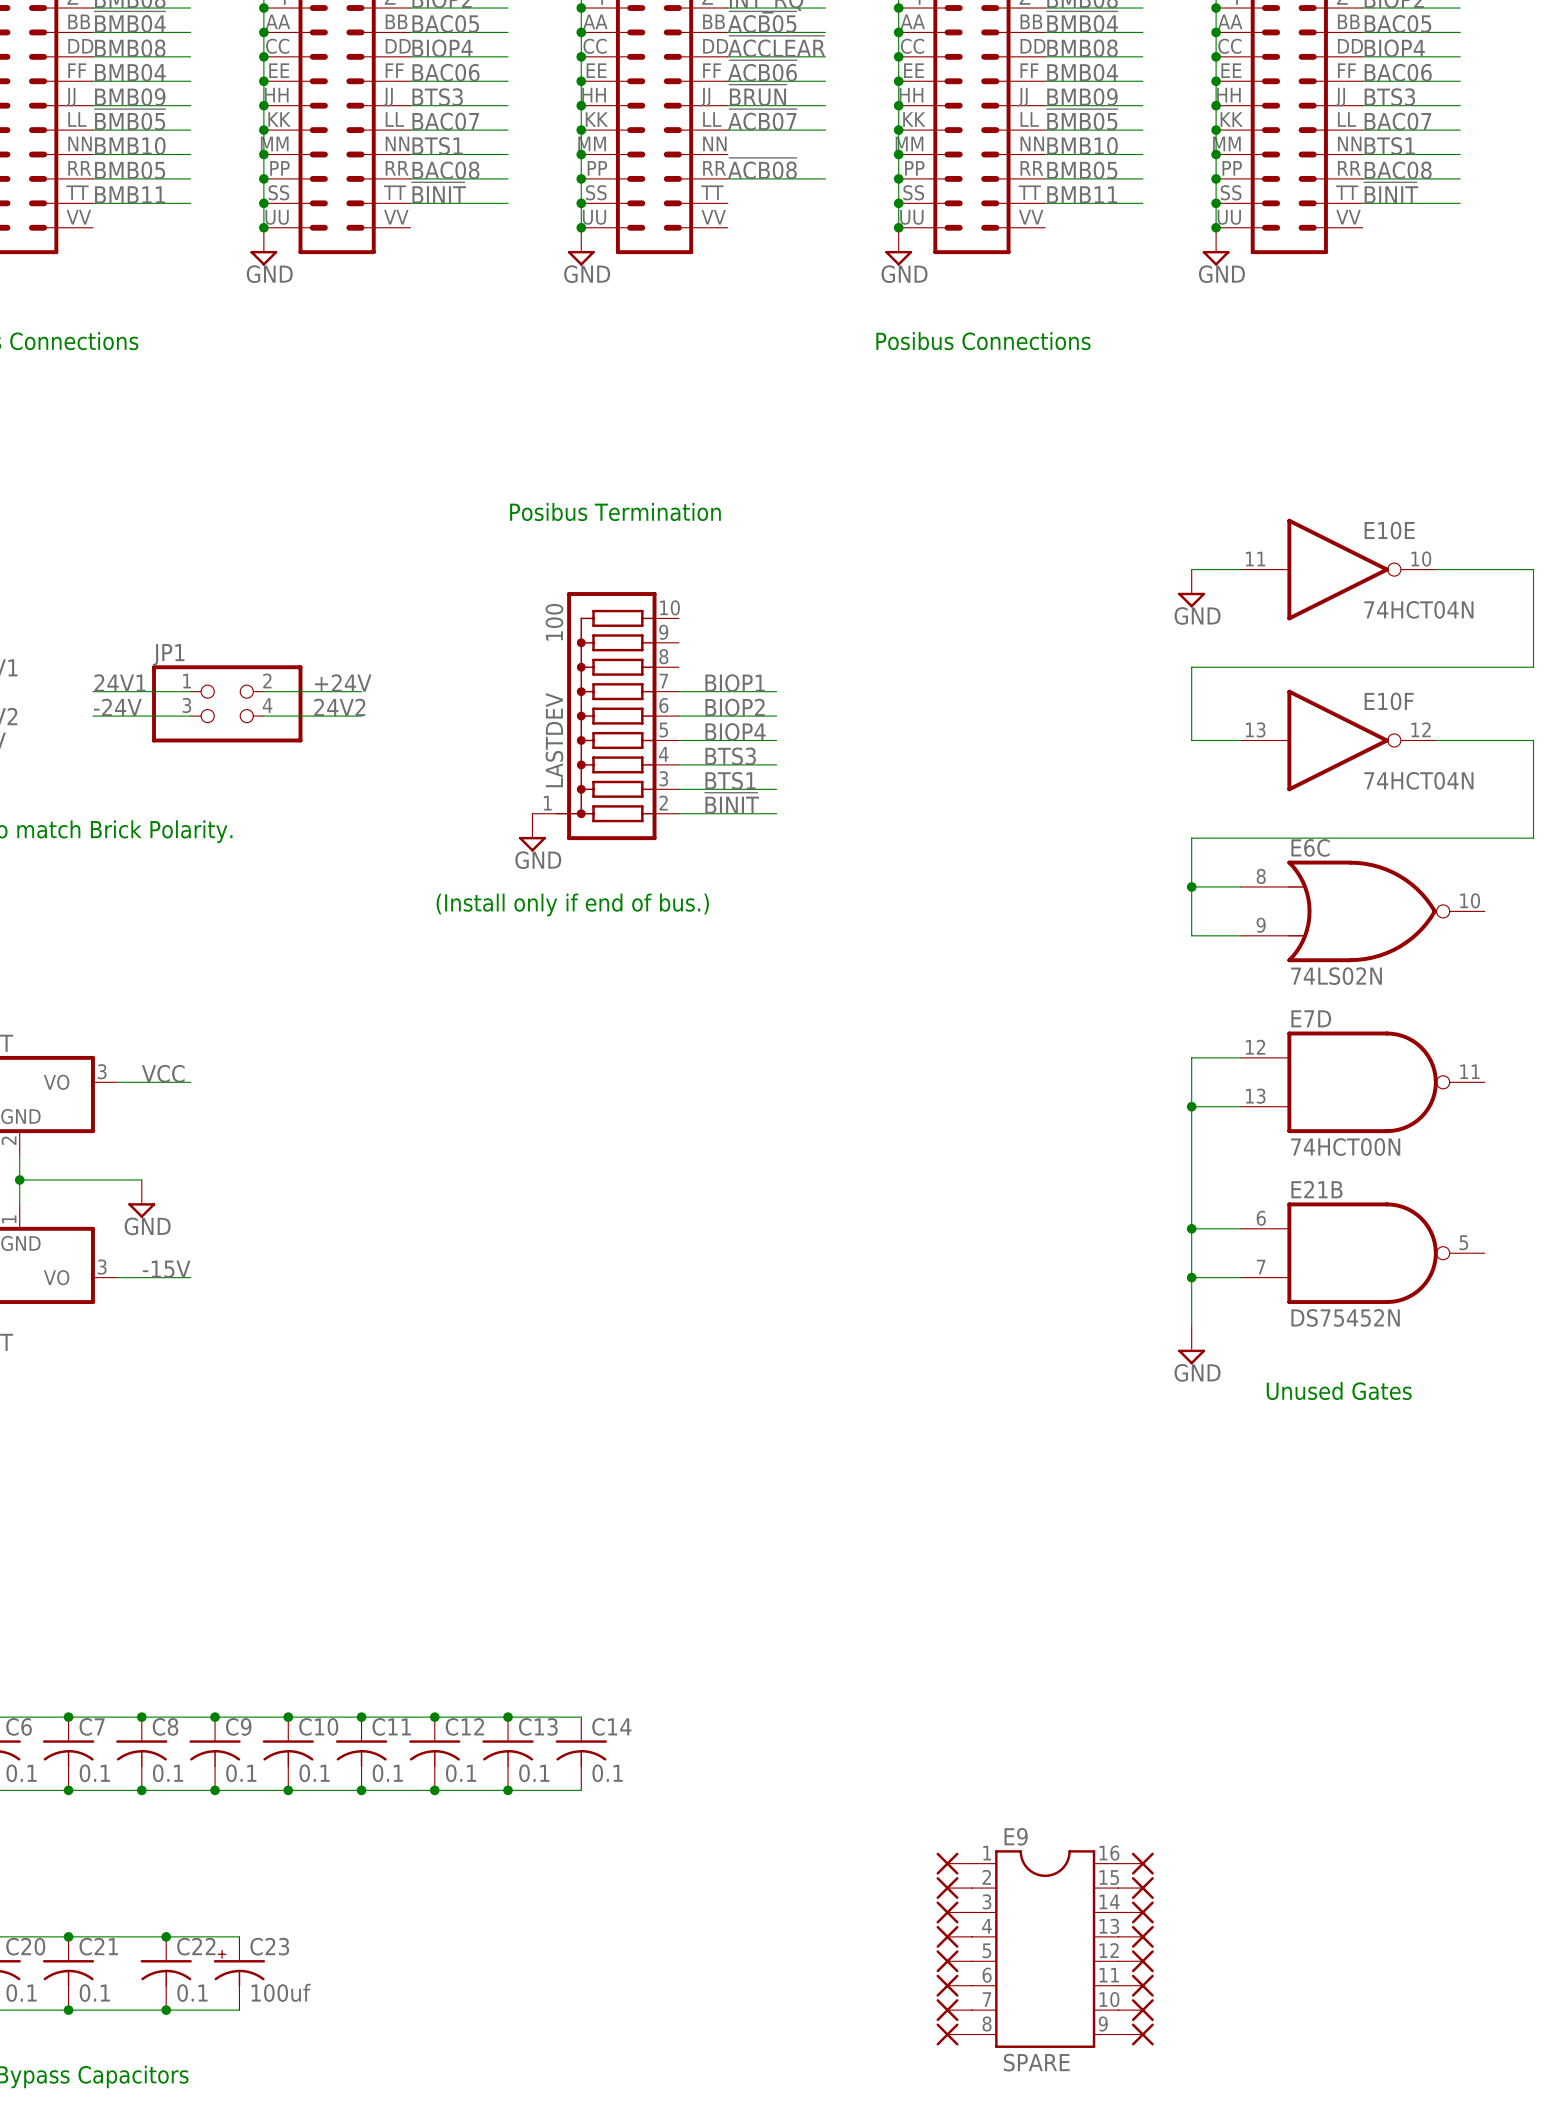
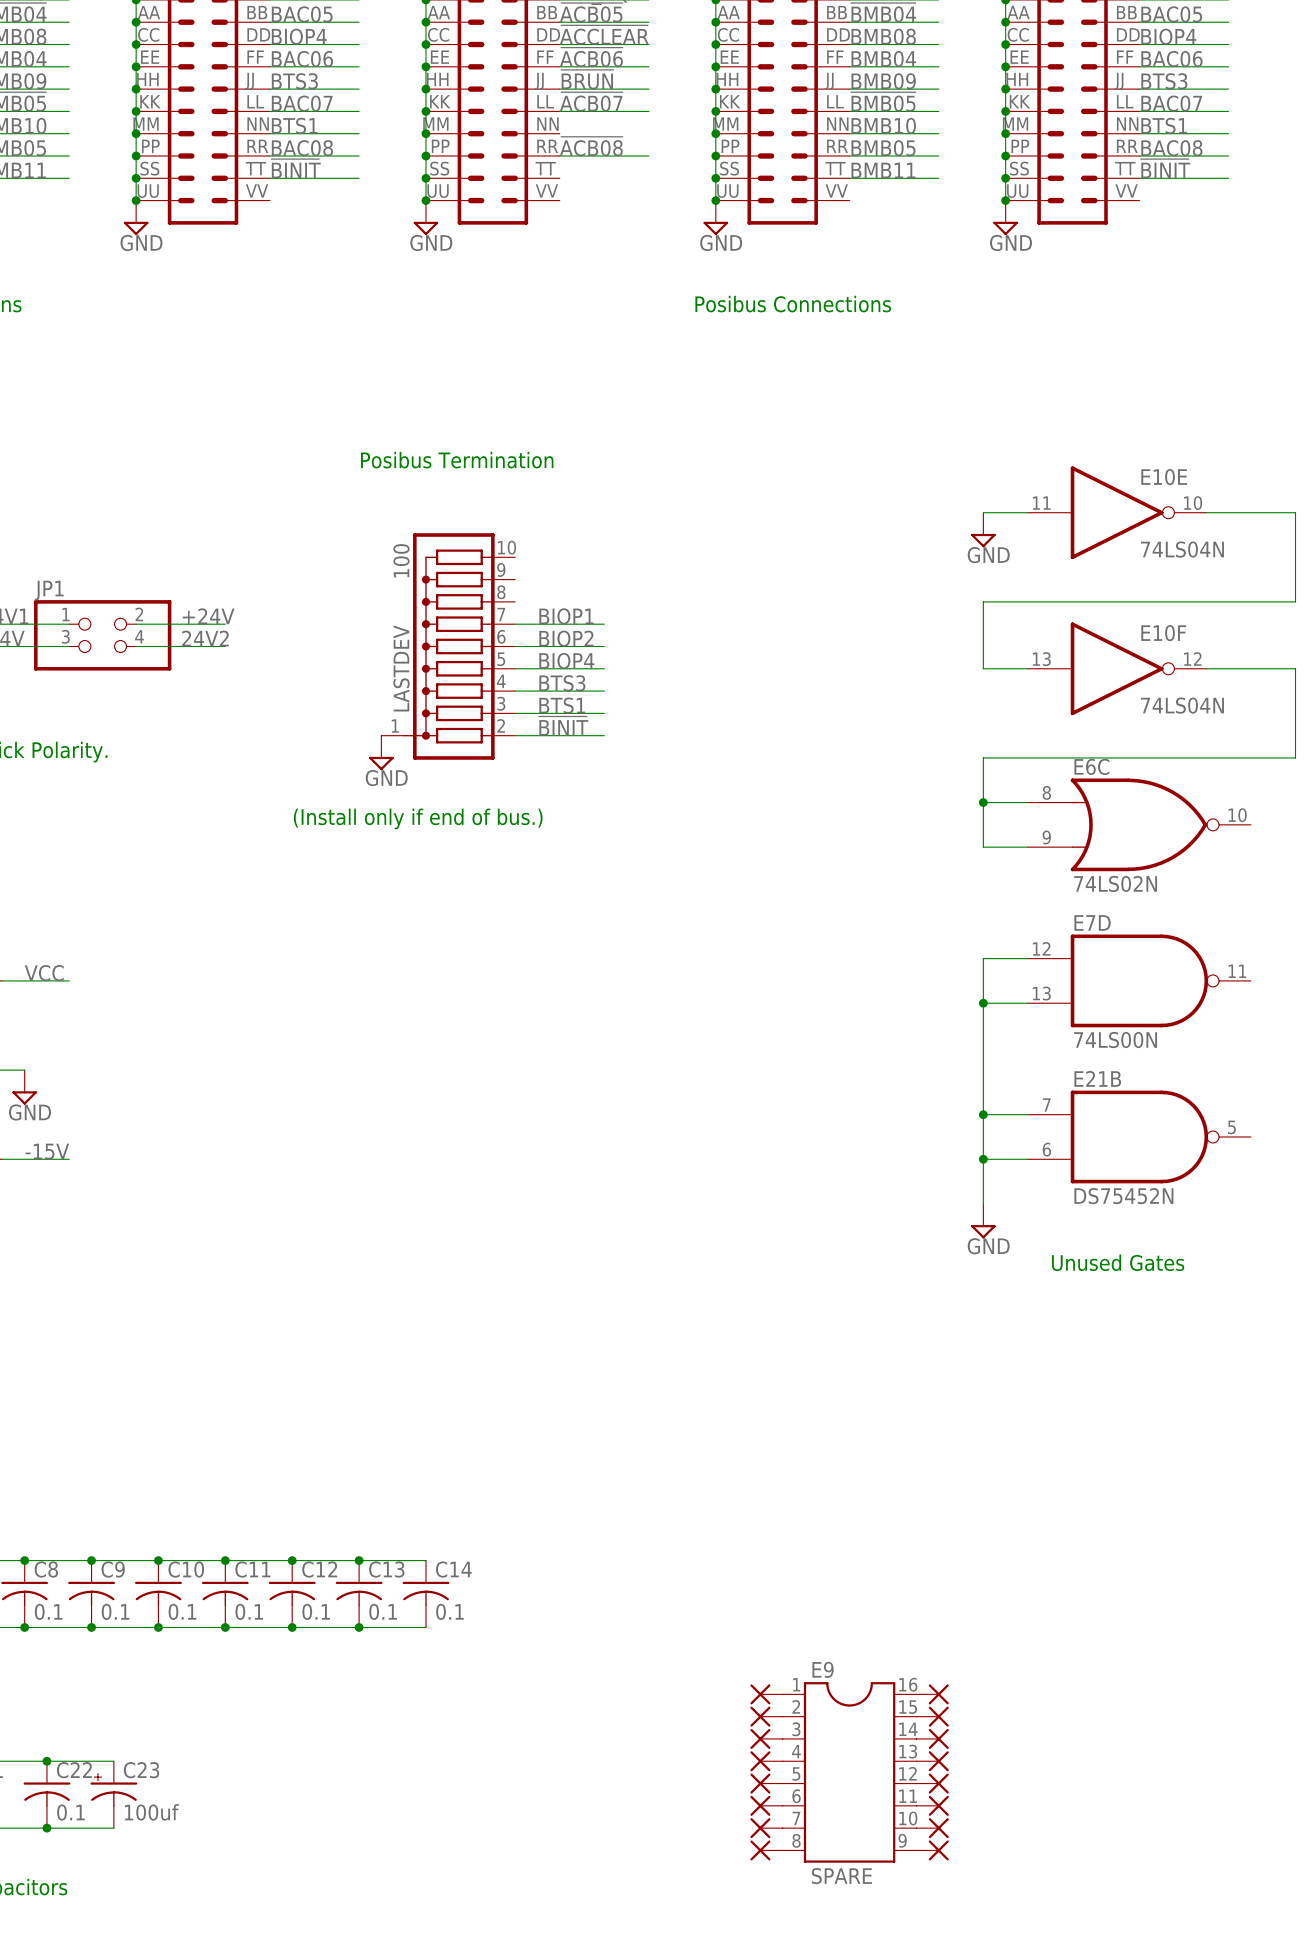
E10E value: 74HCT04N (1418, 609) -> 74LS04N (1182, 549)
E10F value: 74HCT04N (1418, 780) -> 74LS04N (1182, 705)
E7D value: 74HCT00N (1345, 1147) -> 74LS00N (1115, 1040)
E21B flip: as is (1362, 1253) -> up-down (1139, 1136)

